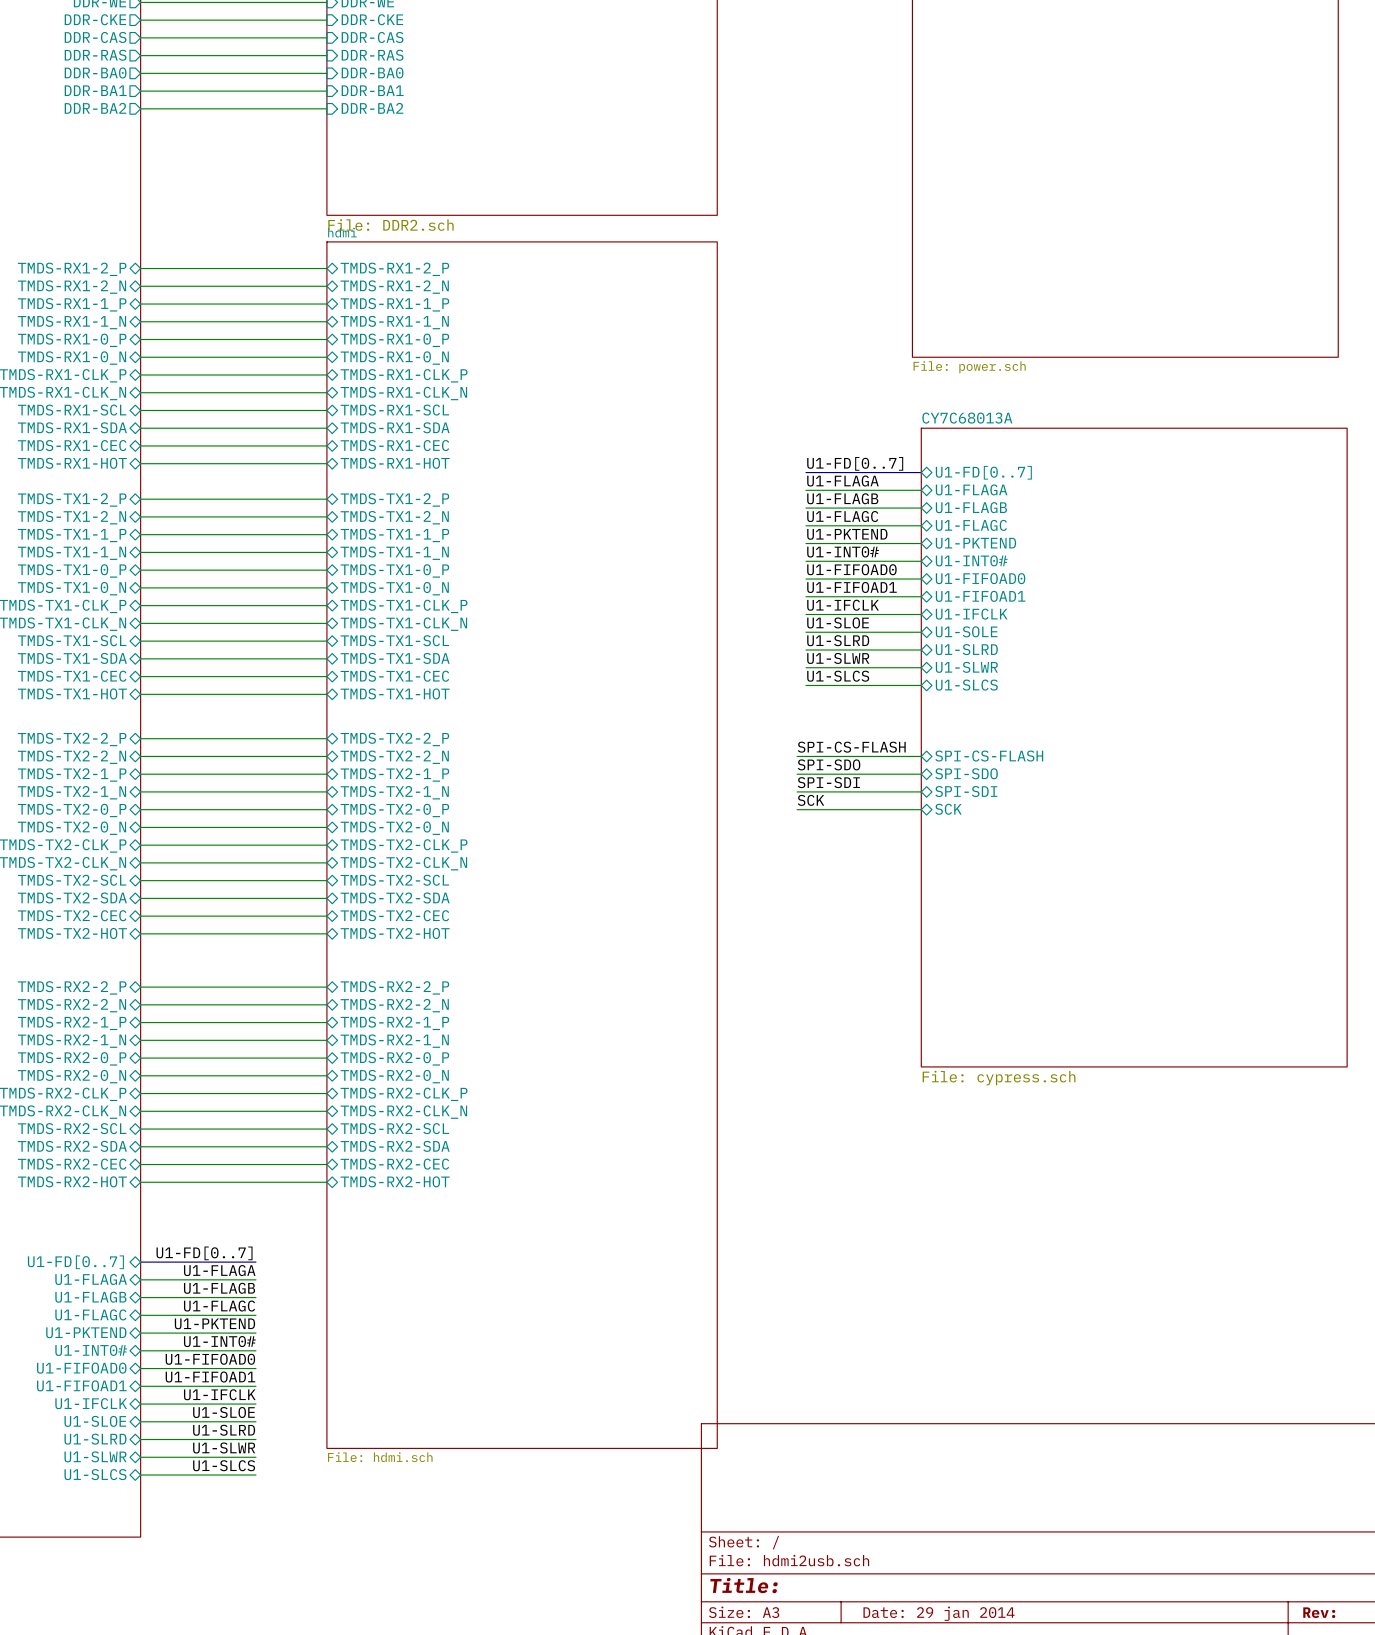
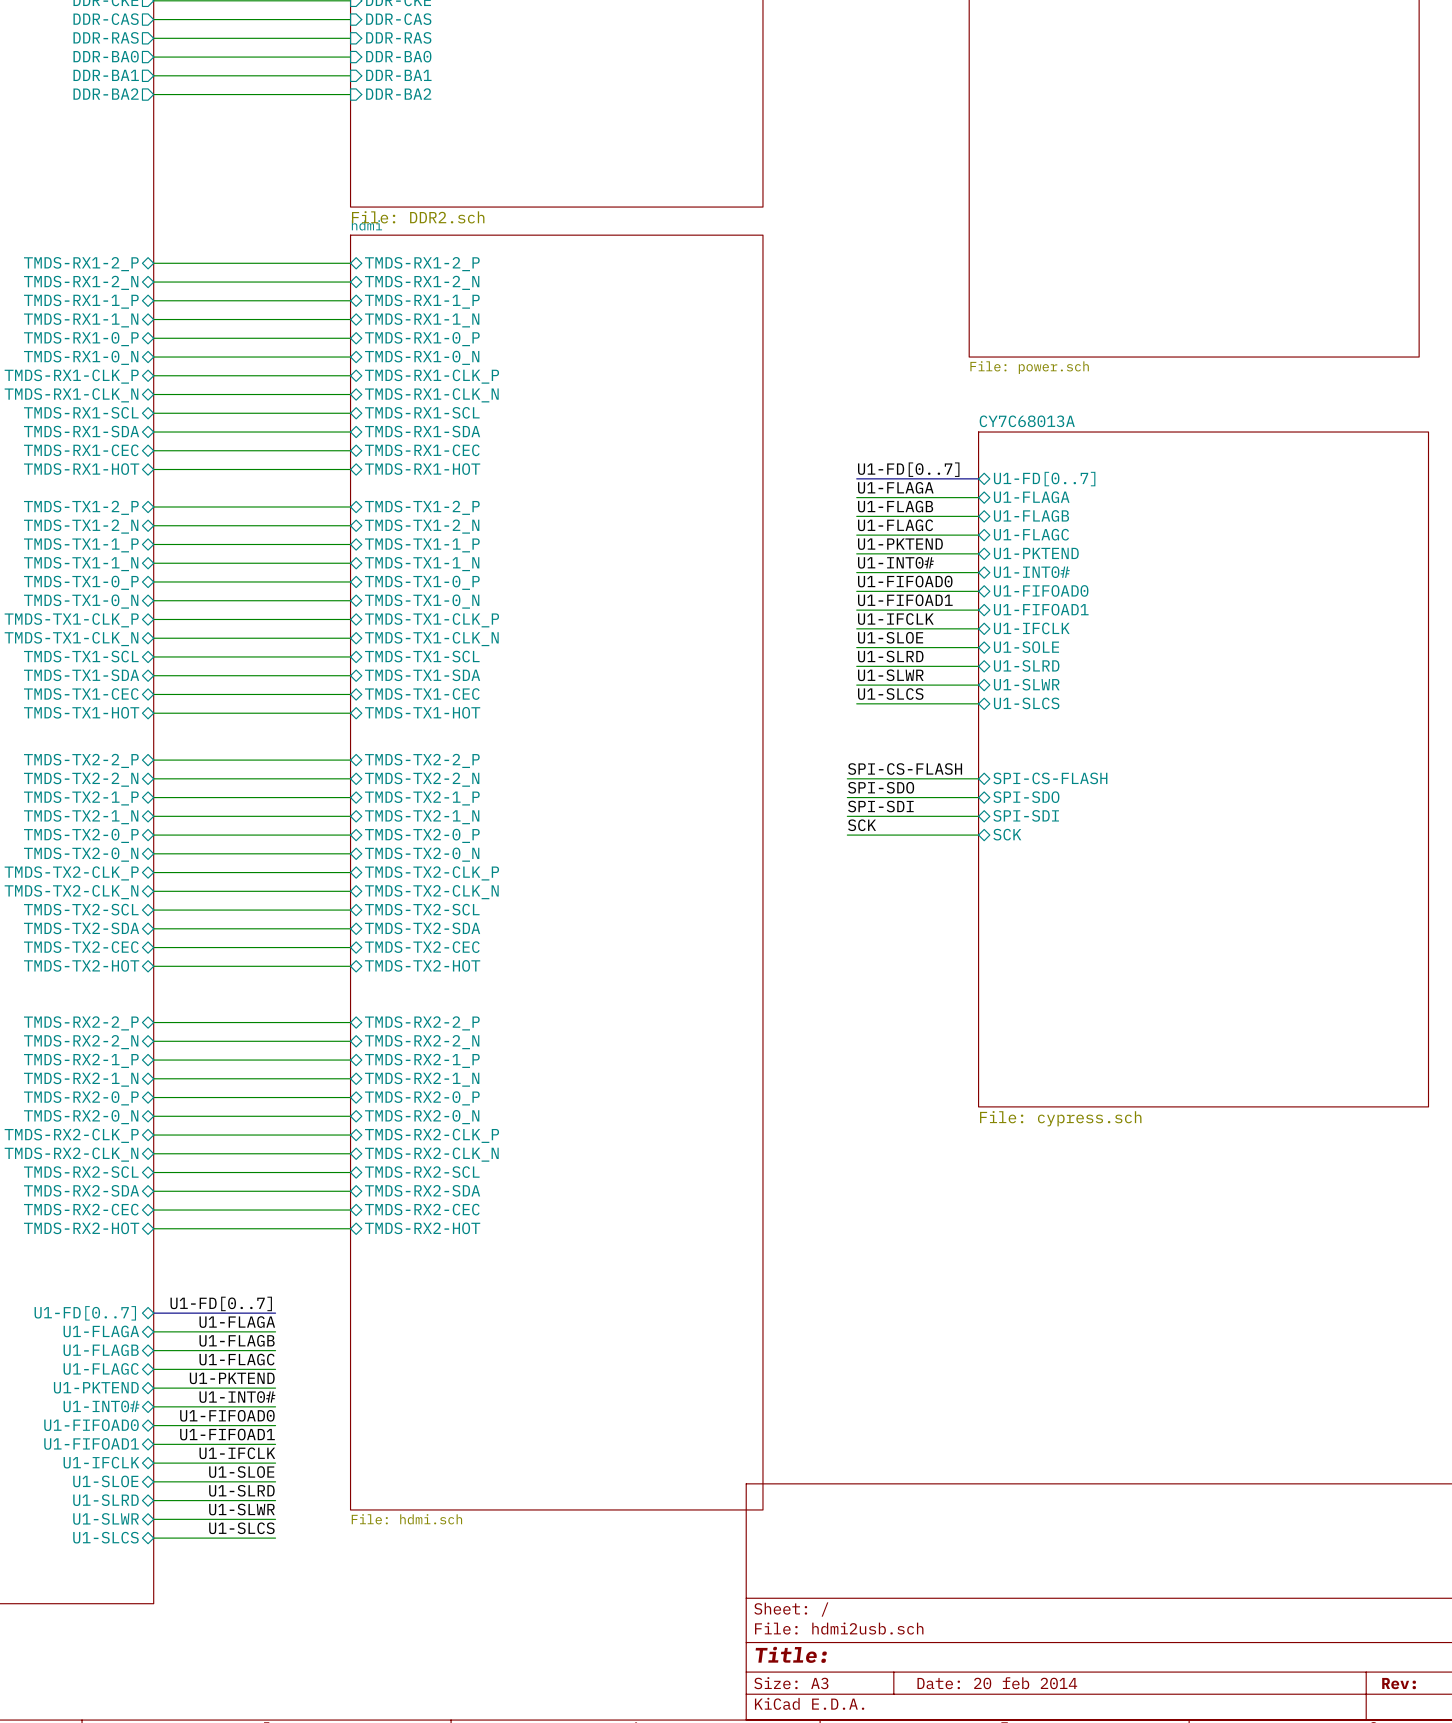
title block: Date: 29 jan 2014 (939, 1613) -> Date: 20 feb 2014 (997, 1683)

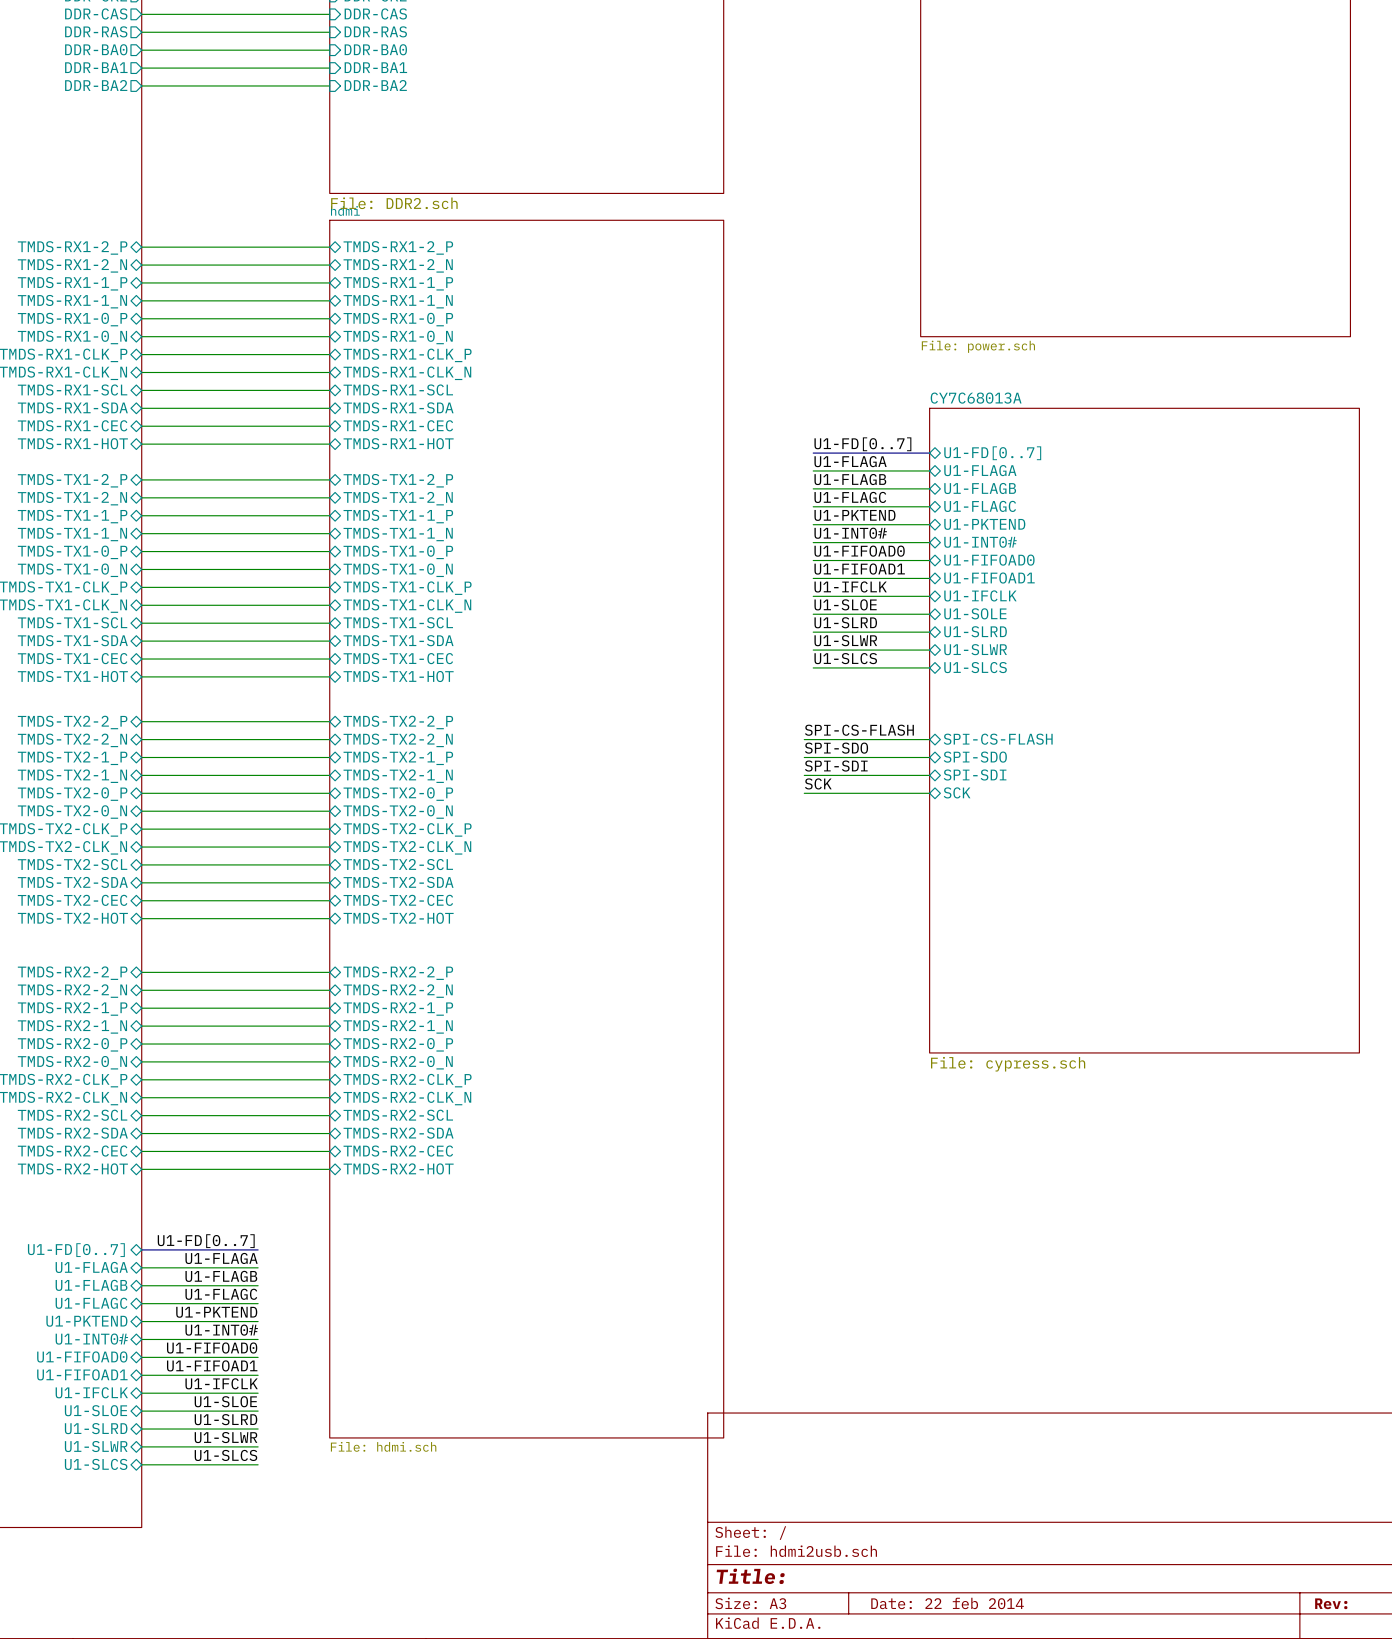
title block: Date: 20 feb 2014 (997, 1683) -> Date: 22 feb 2014 (947, 1603)

